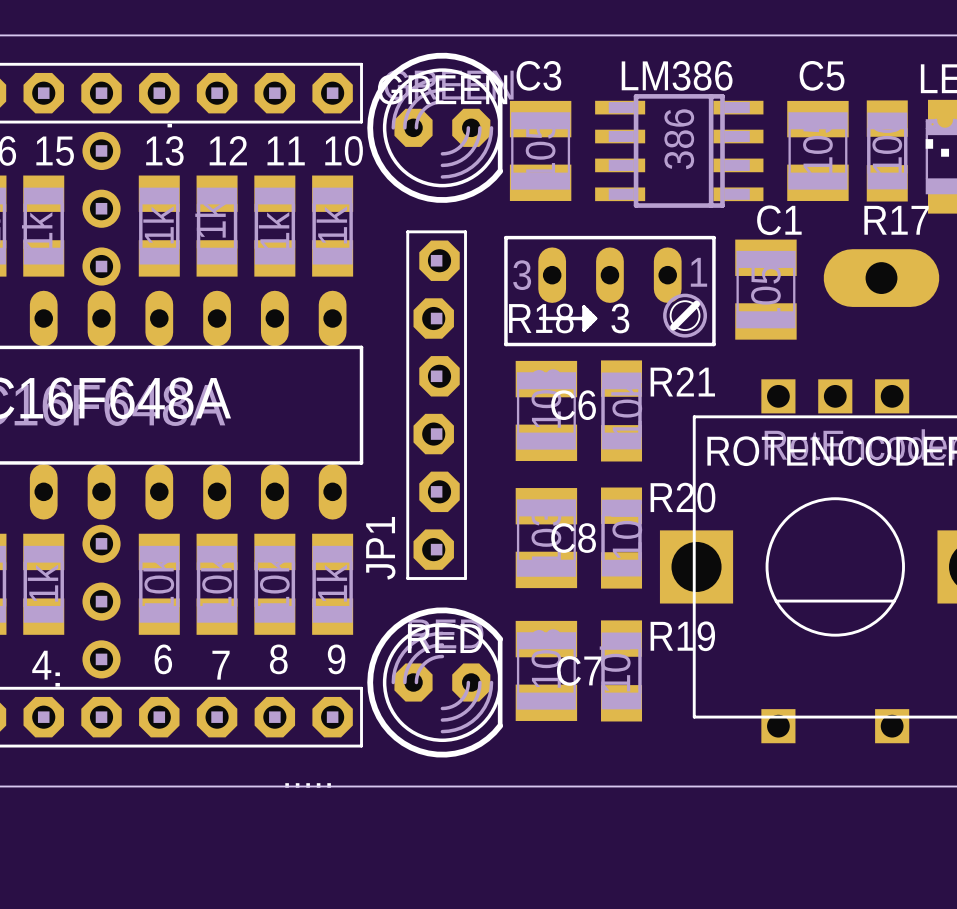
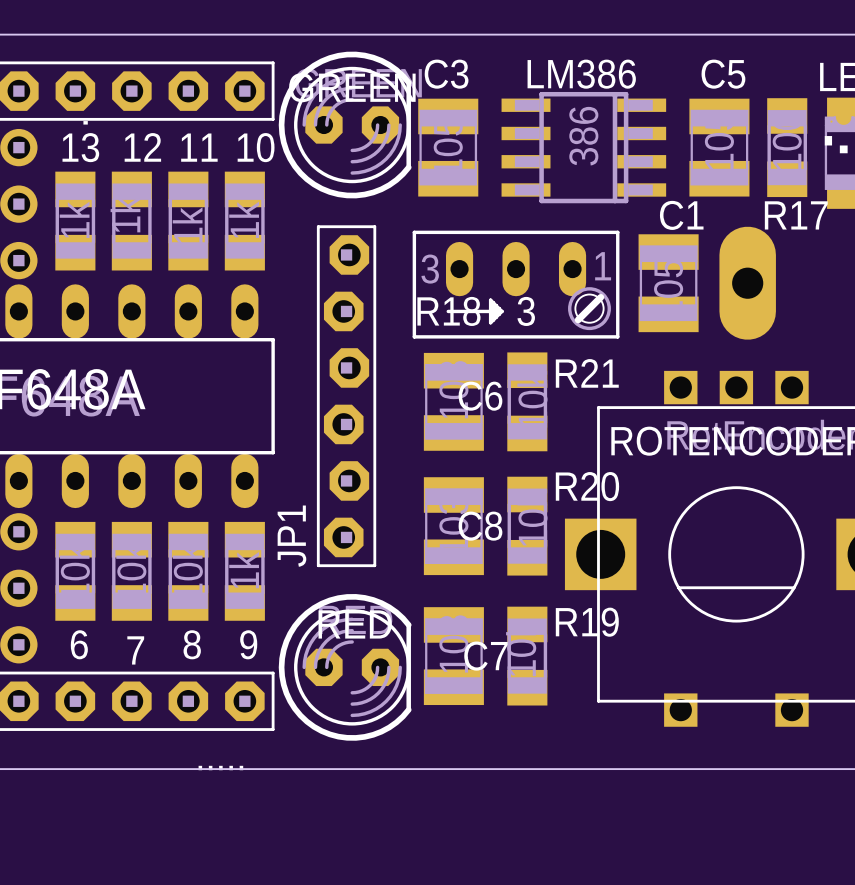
part rotation: 0° (881, 278) -> 90° clockwise (747, 283)

